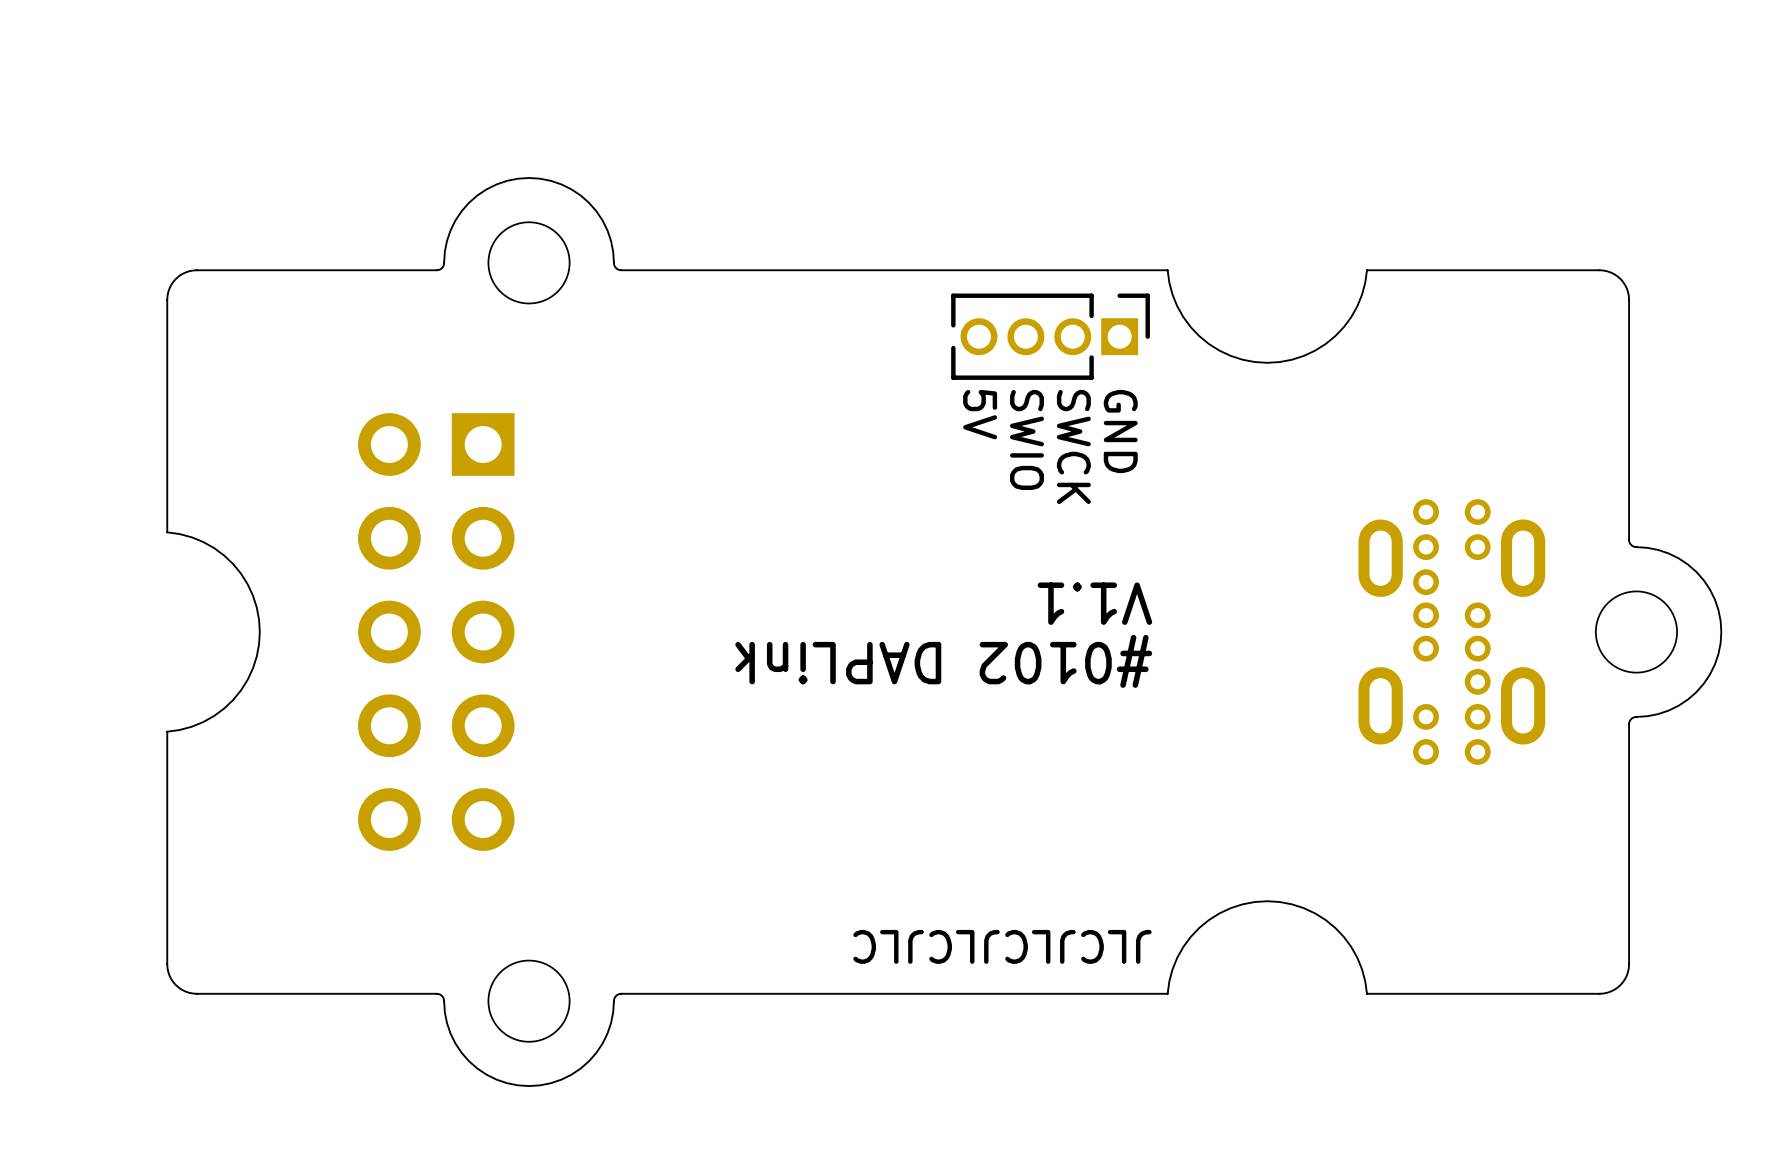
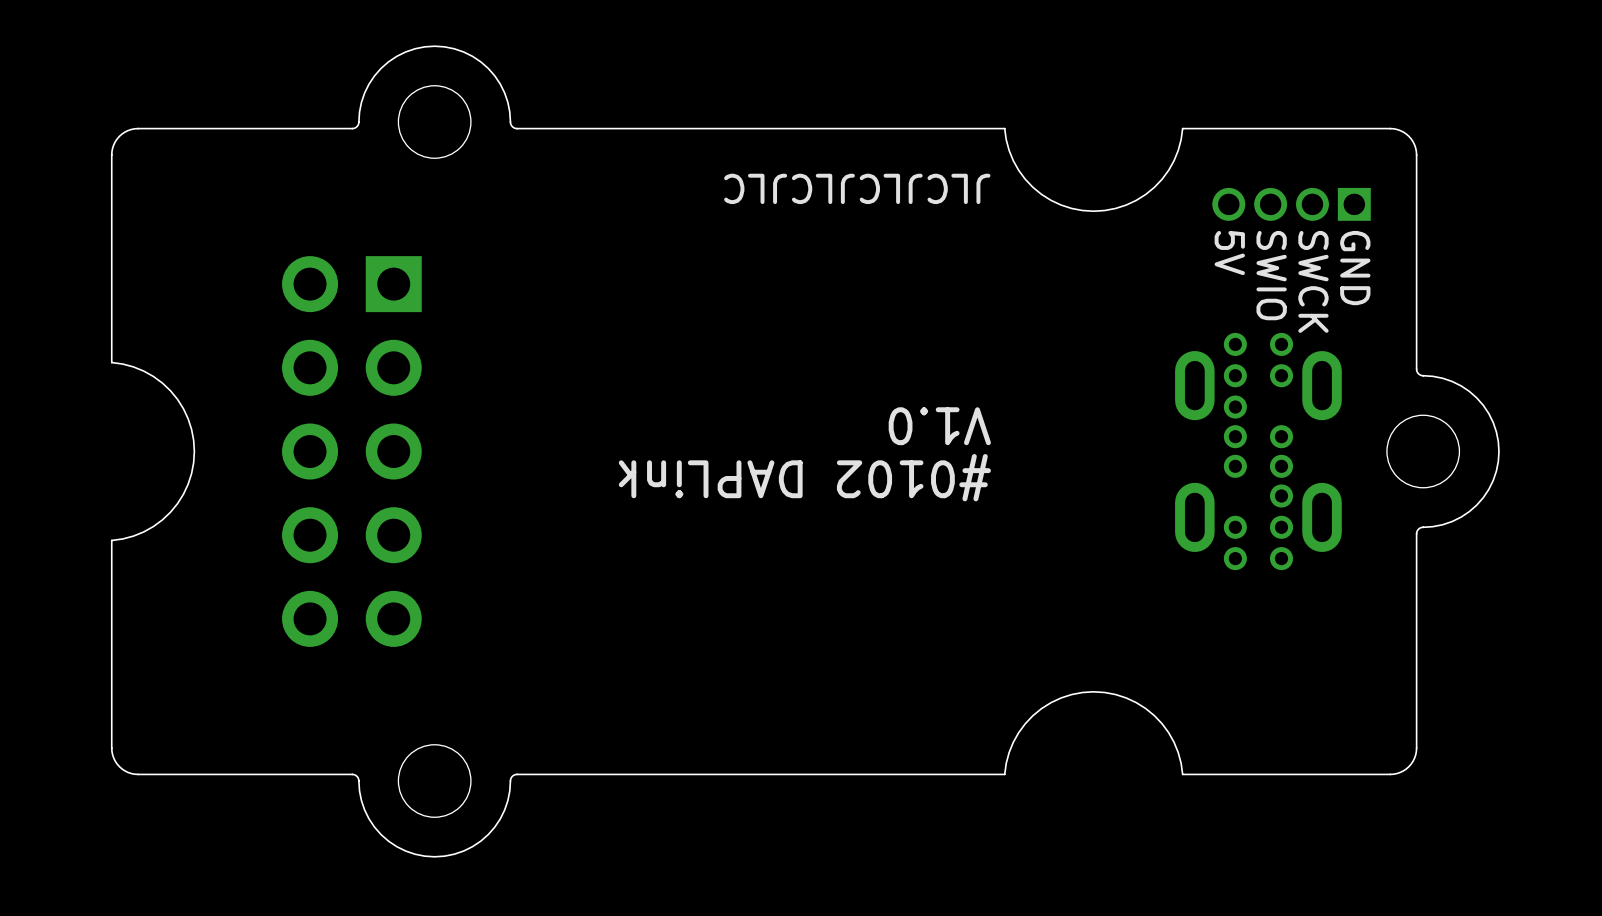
part side: bottom (1050, 336) -> top (1291, 204)
text position: 5V (980, 414) -> 5V (1229, 253)
text position: GND (1120, 431) -> GND (1355, 268)
text position: SWIO (1026, 439) -> SWIO (1271, 275)
text position: SWCK (1073, 446) -> SWCK (1313, 281)
text: V1.1 (1094, 603) -> V1.0 (939, 426)
text position: JLCJLCJLCJLC (1002, 946) -> JLCJLCJLCJLC (857, 188)

